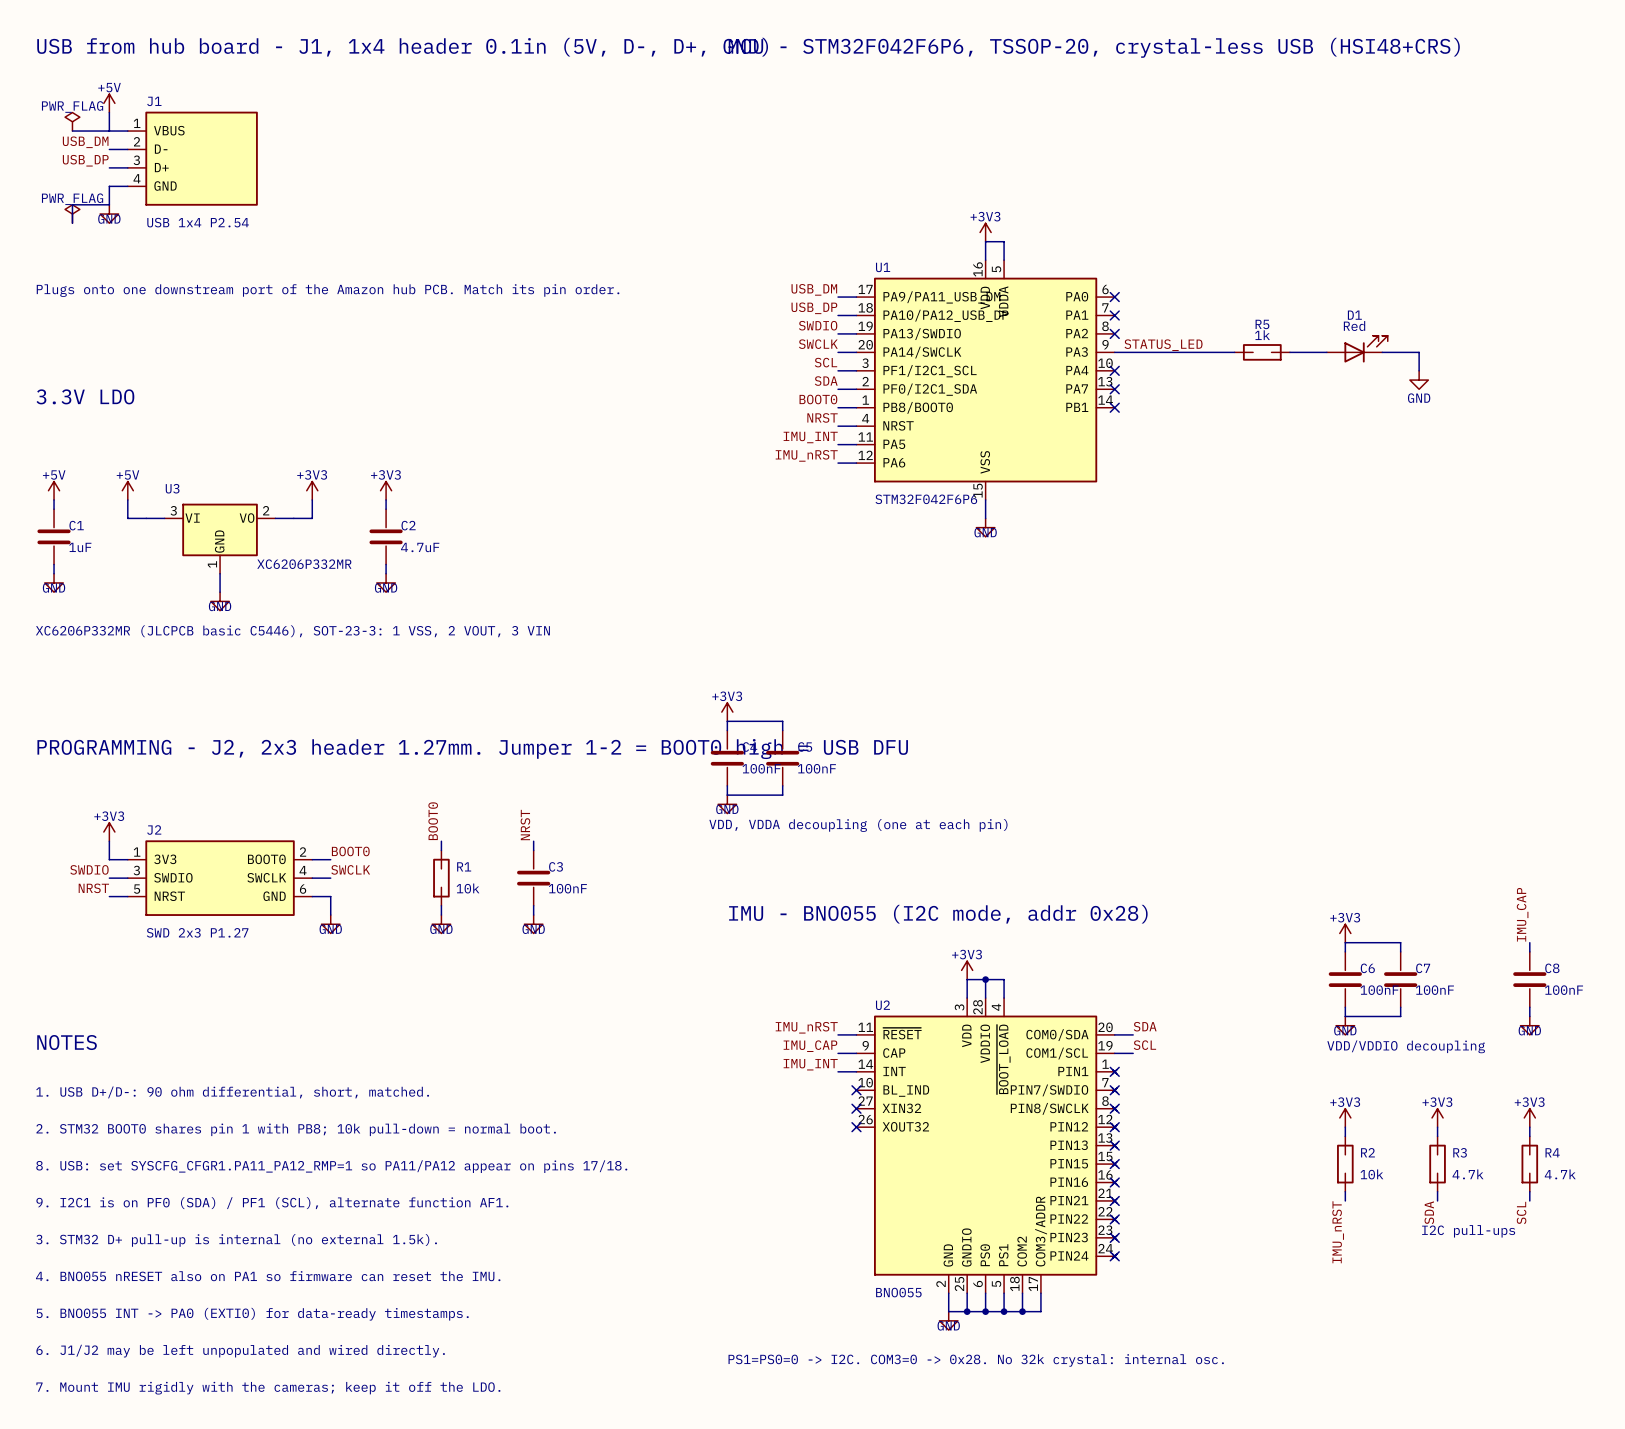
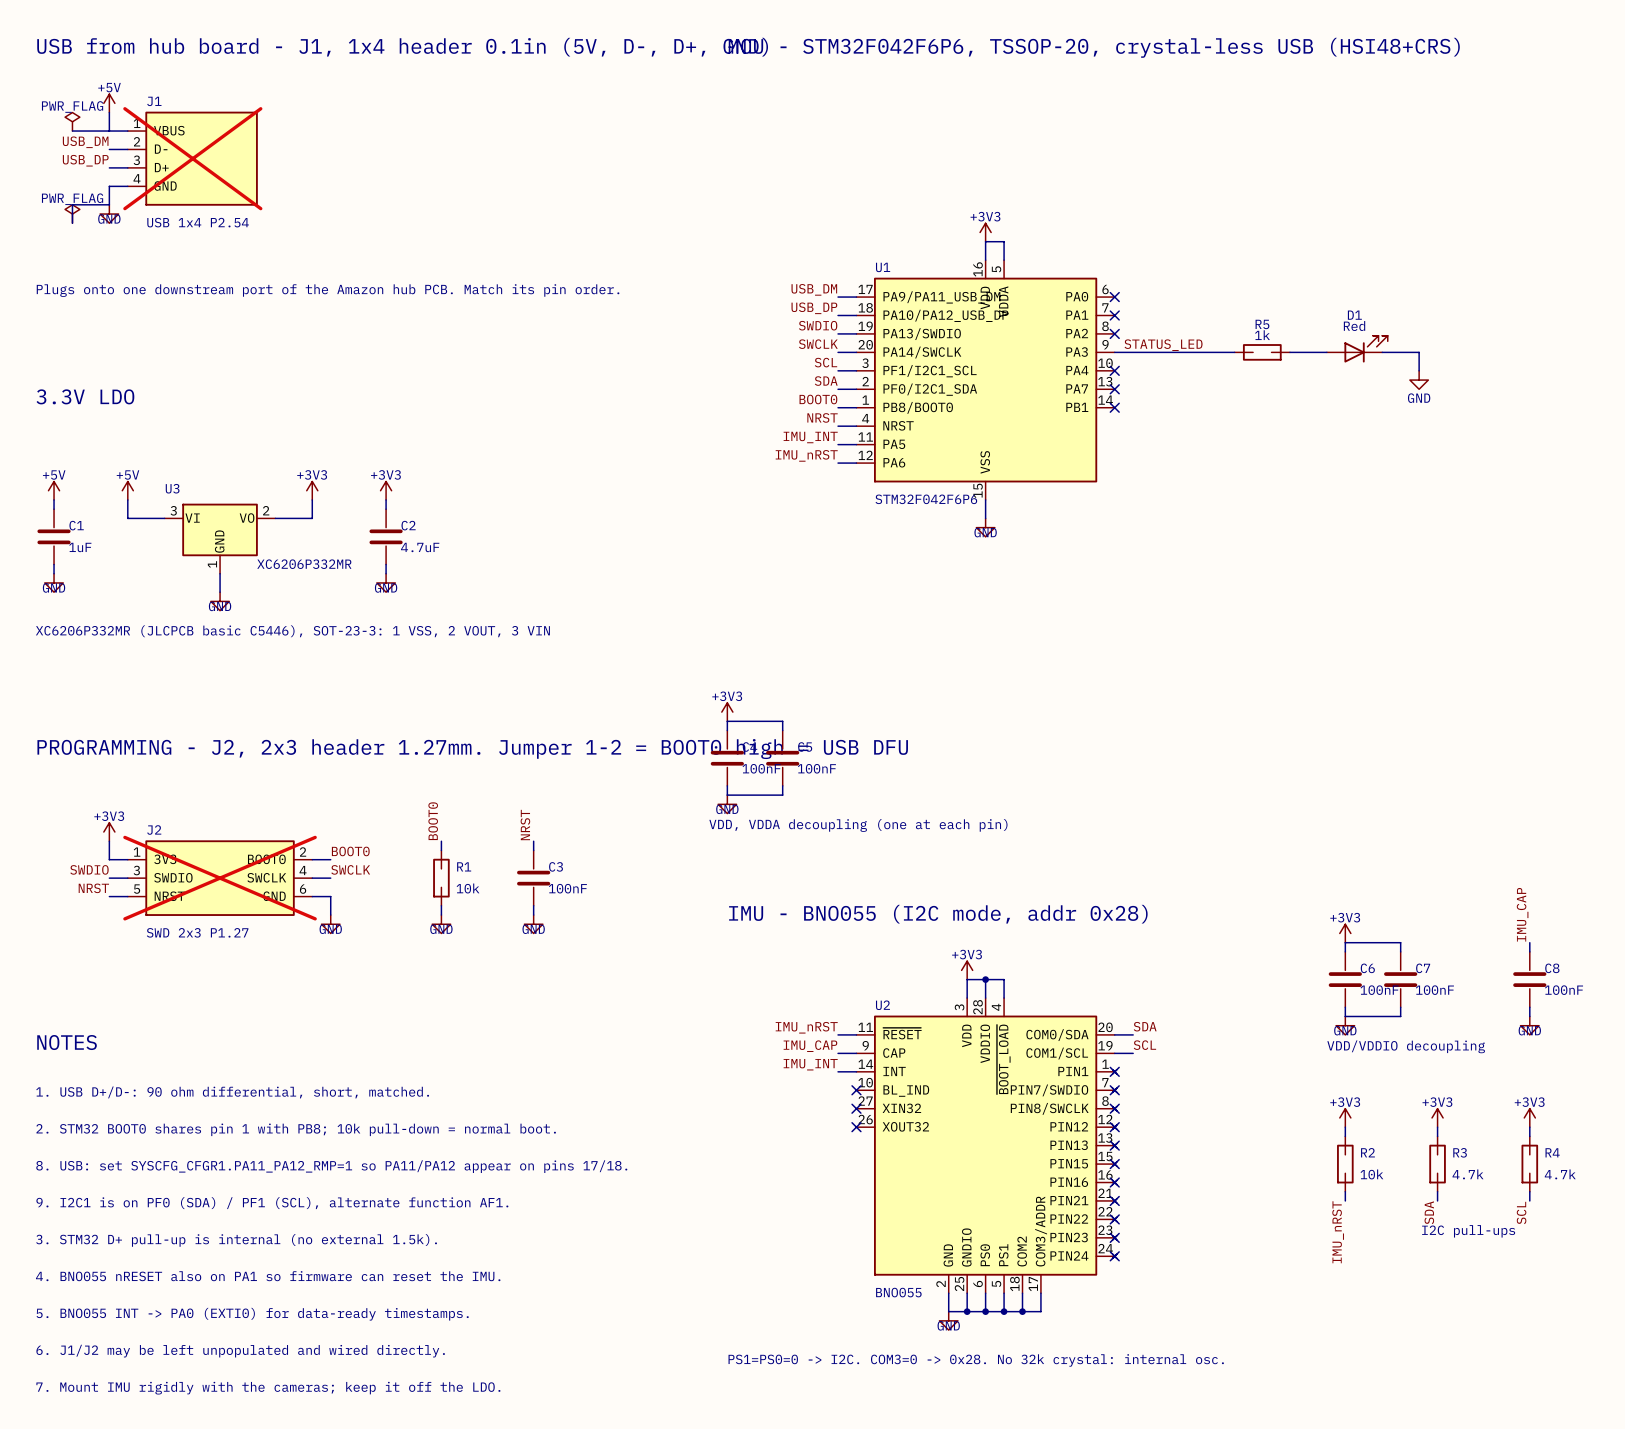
J1 do-not-place cross: none -> (192, 158)
J2 do-not-place cross: none -> (220, 878)

